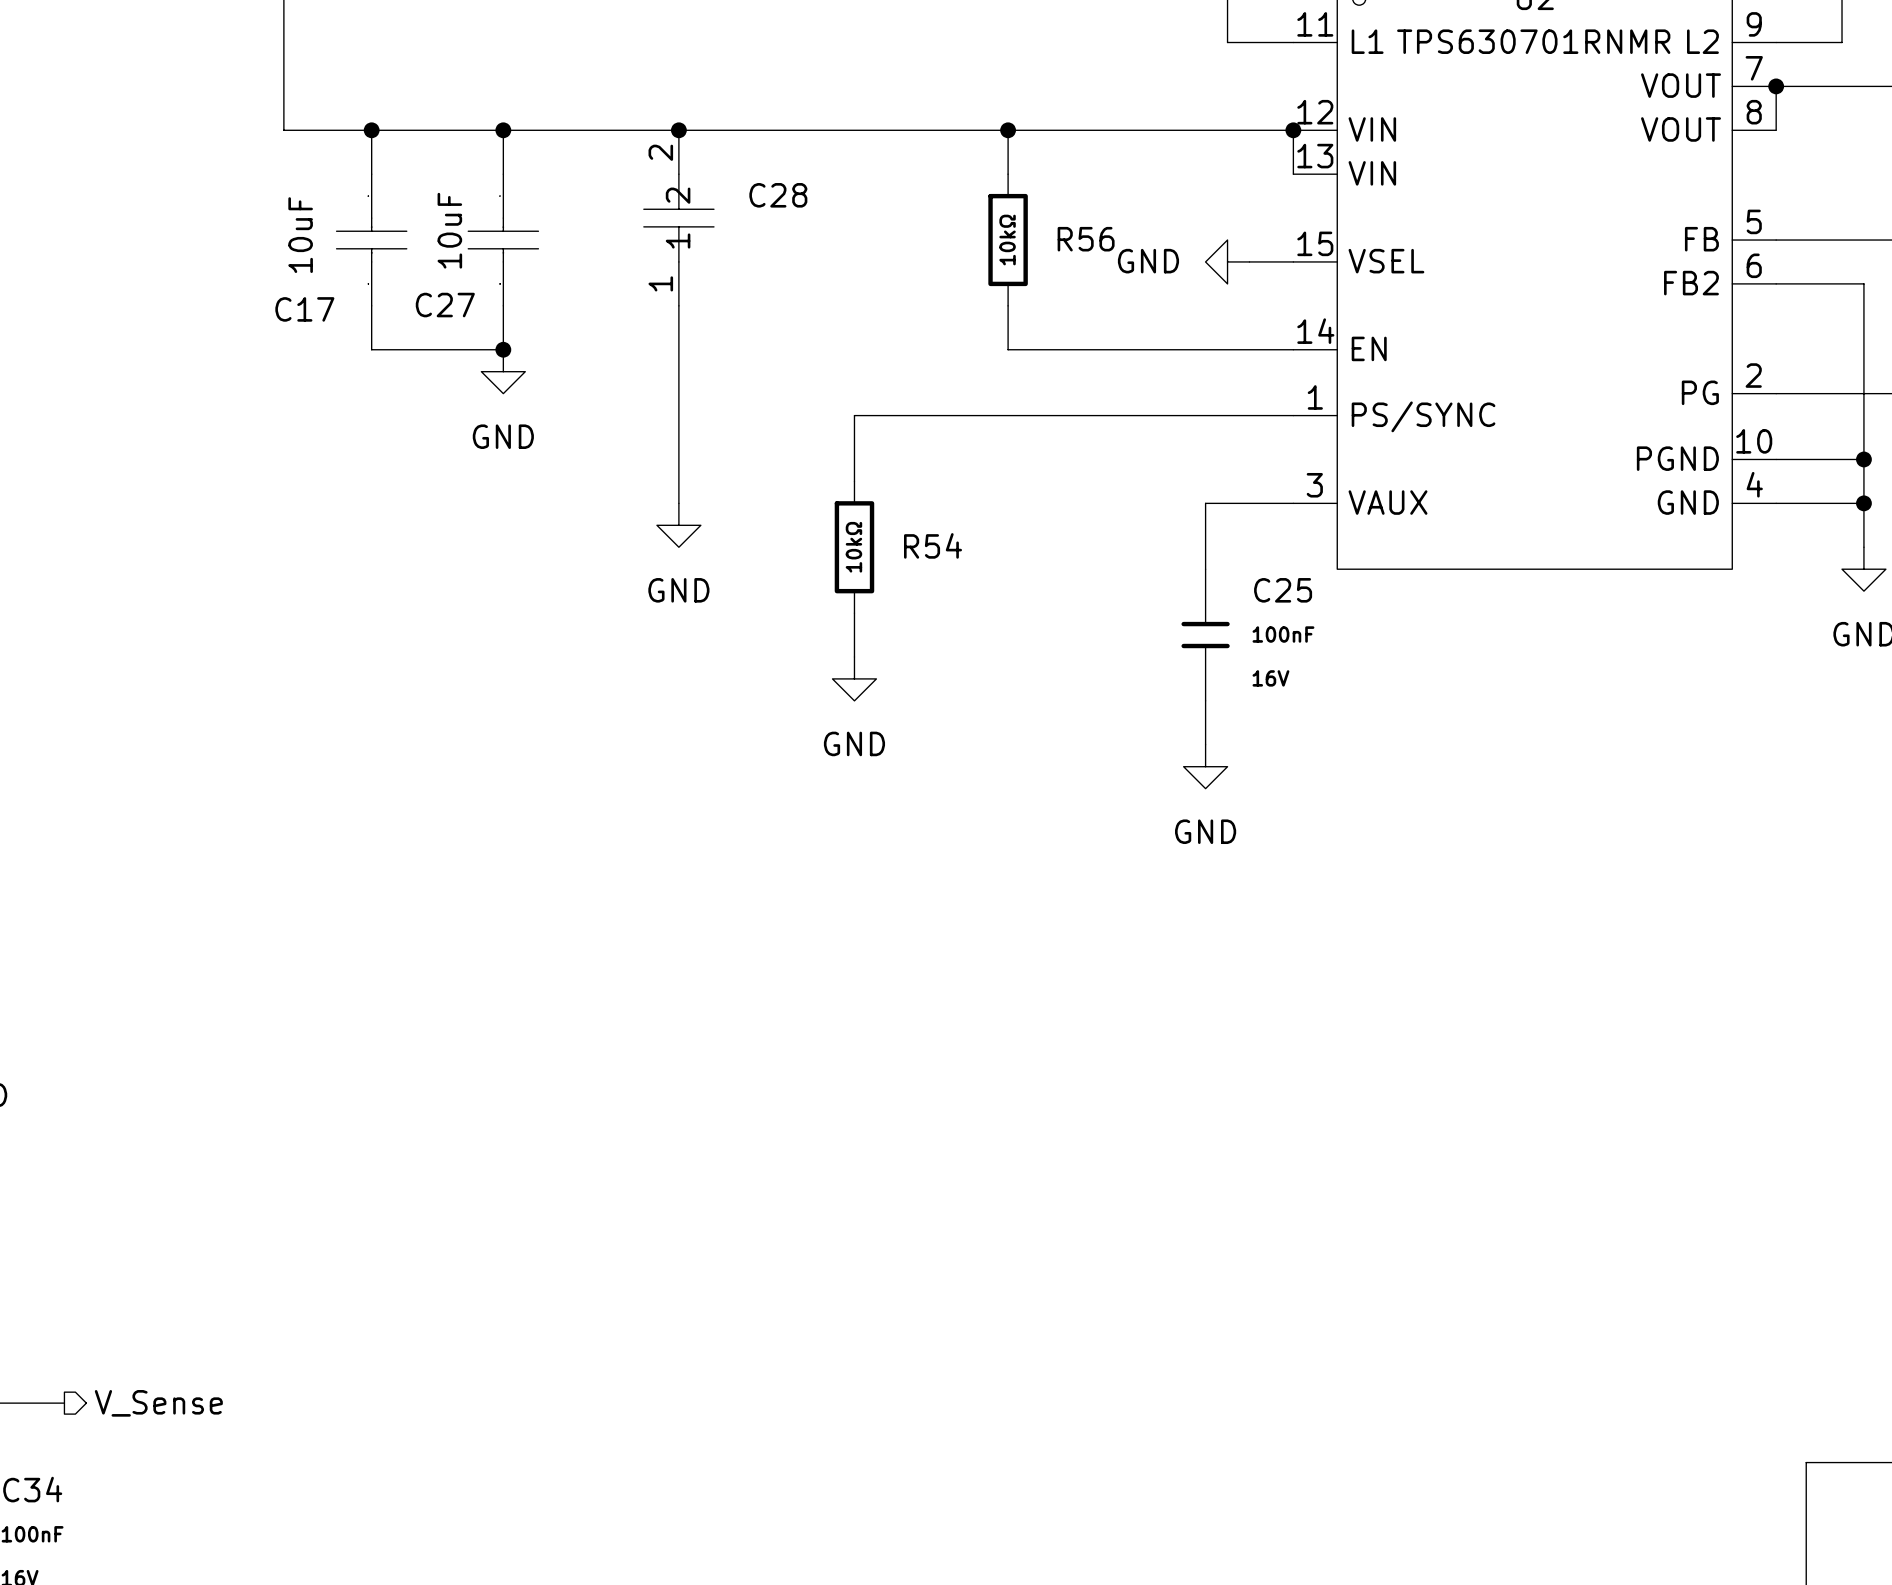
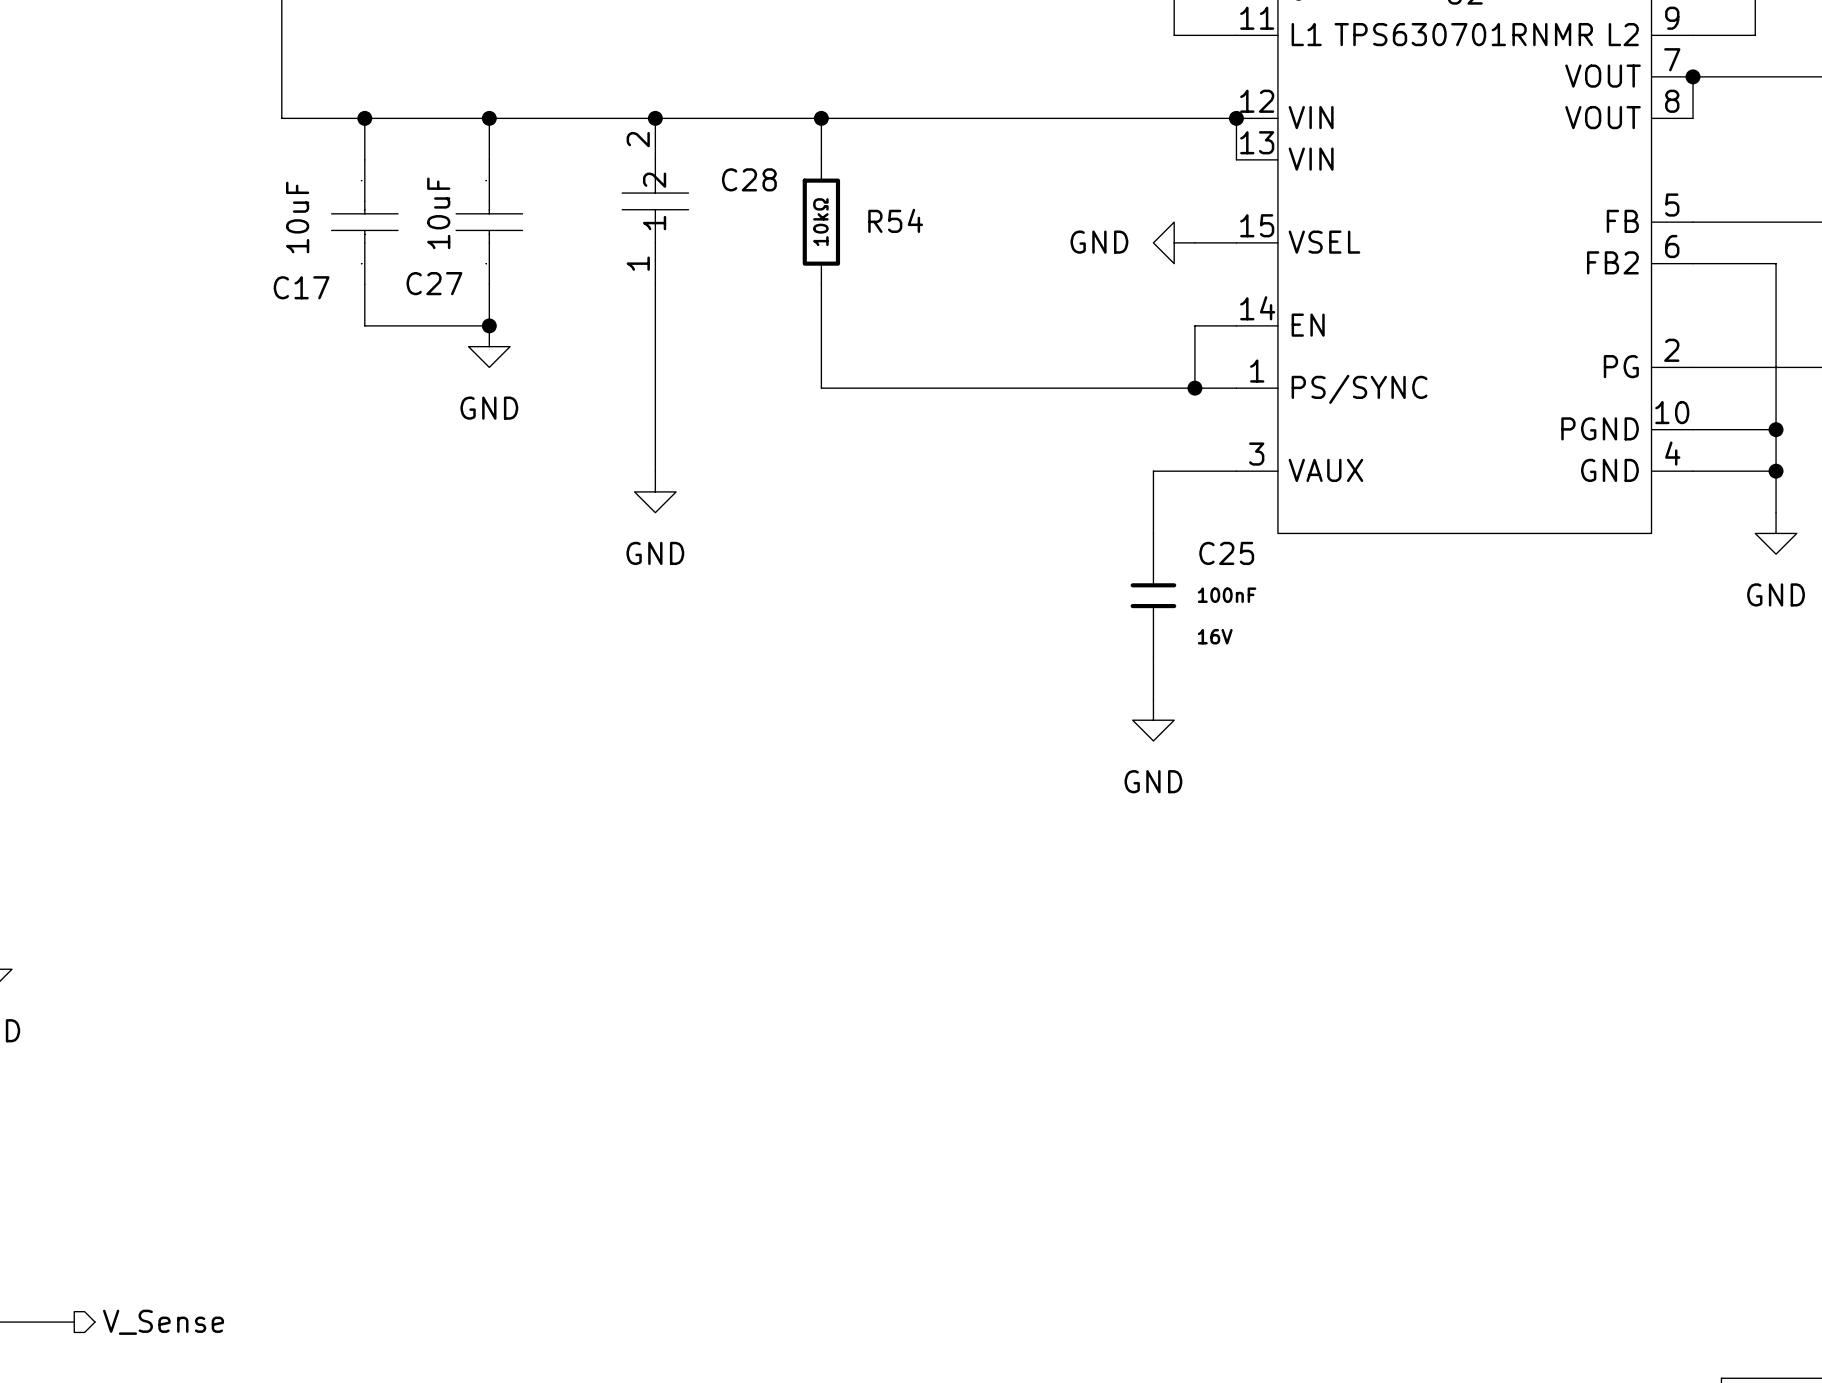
junction: none -> (821, 118)
wire: (1008, 130) (1008, 174) -> (821, 118) (821, 159)
junction: (1008, 130) -> none
R56: 10kΩ (1008, 240) -> none
wire: (1008, 305) (1008, 349) (1249, 349) -> (1194, 388) (1194, 325)
wire: (854, 415) (854, 481) -> (821, 388) (821, 284)
junction: none -> (1194, 388)
R54 position: (854, 547) -> (821, 222)
wire: (854, 613) (854, 656) -> none
power symbol: GND (854, 678) -> none

